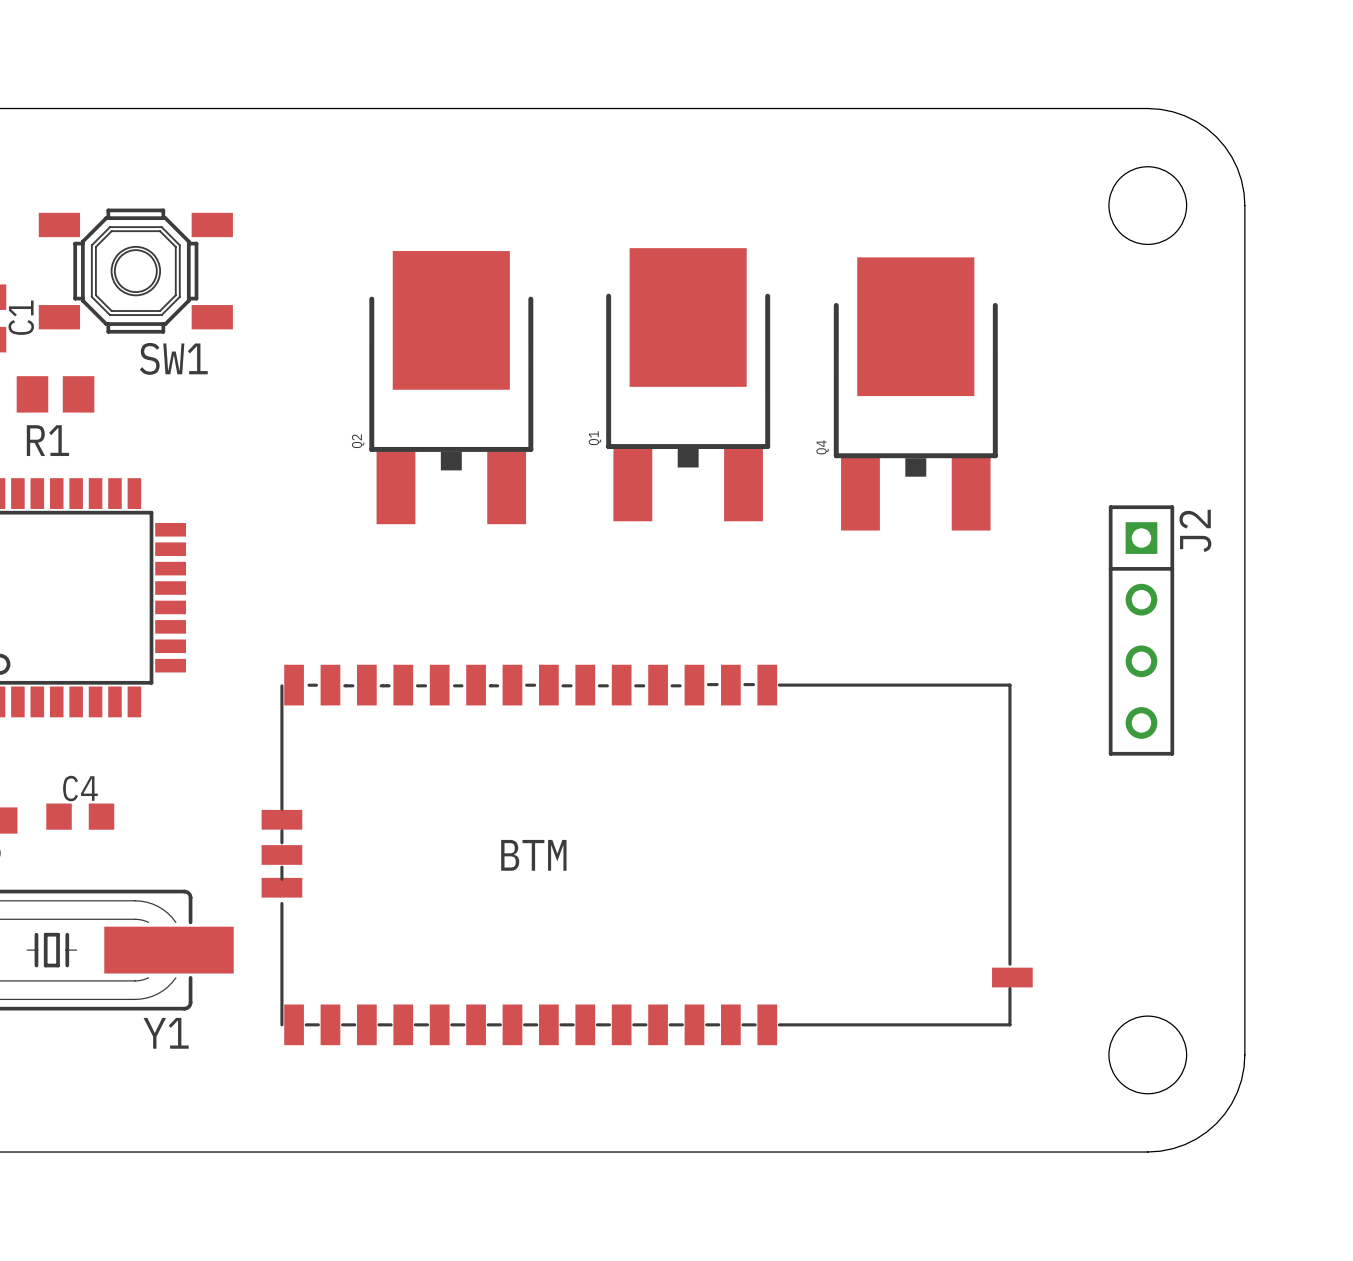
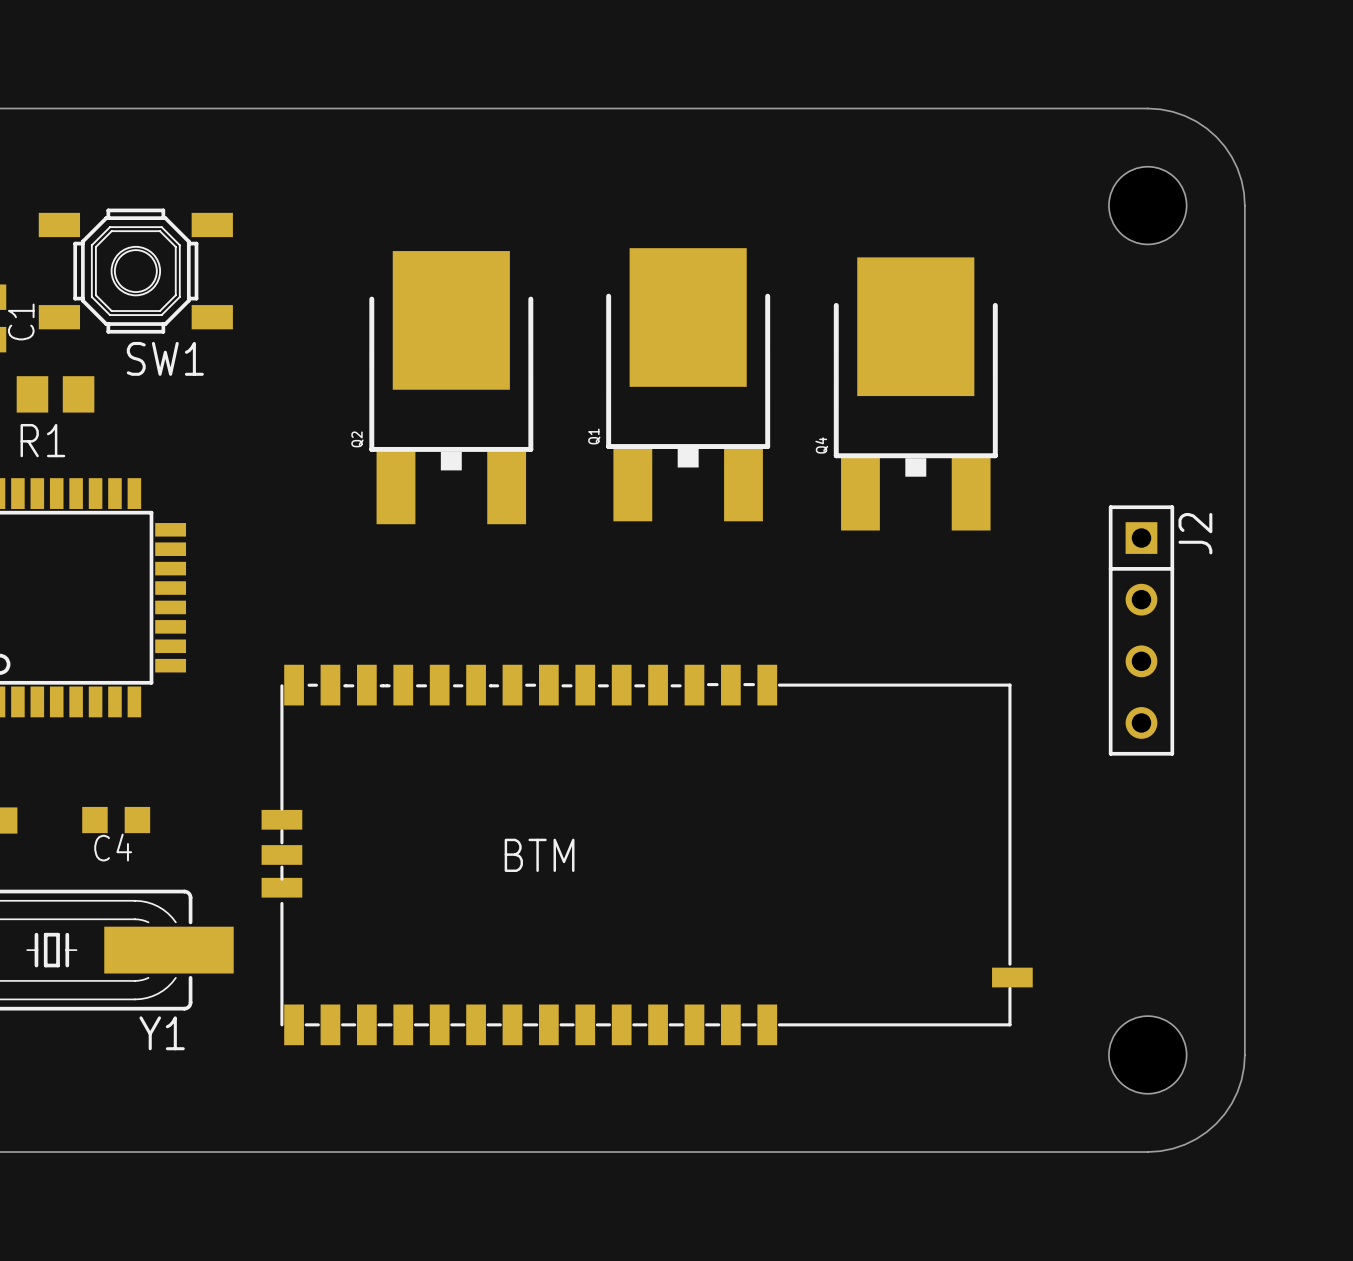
C4 name position: C4 (80, 788) -> C4 (113, 847)
C4 position: (80, 816) -> (116, 820)

